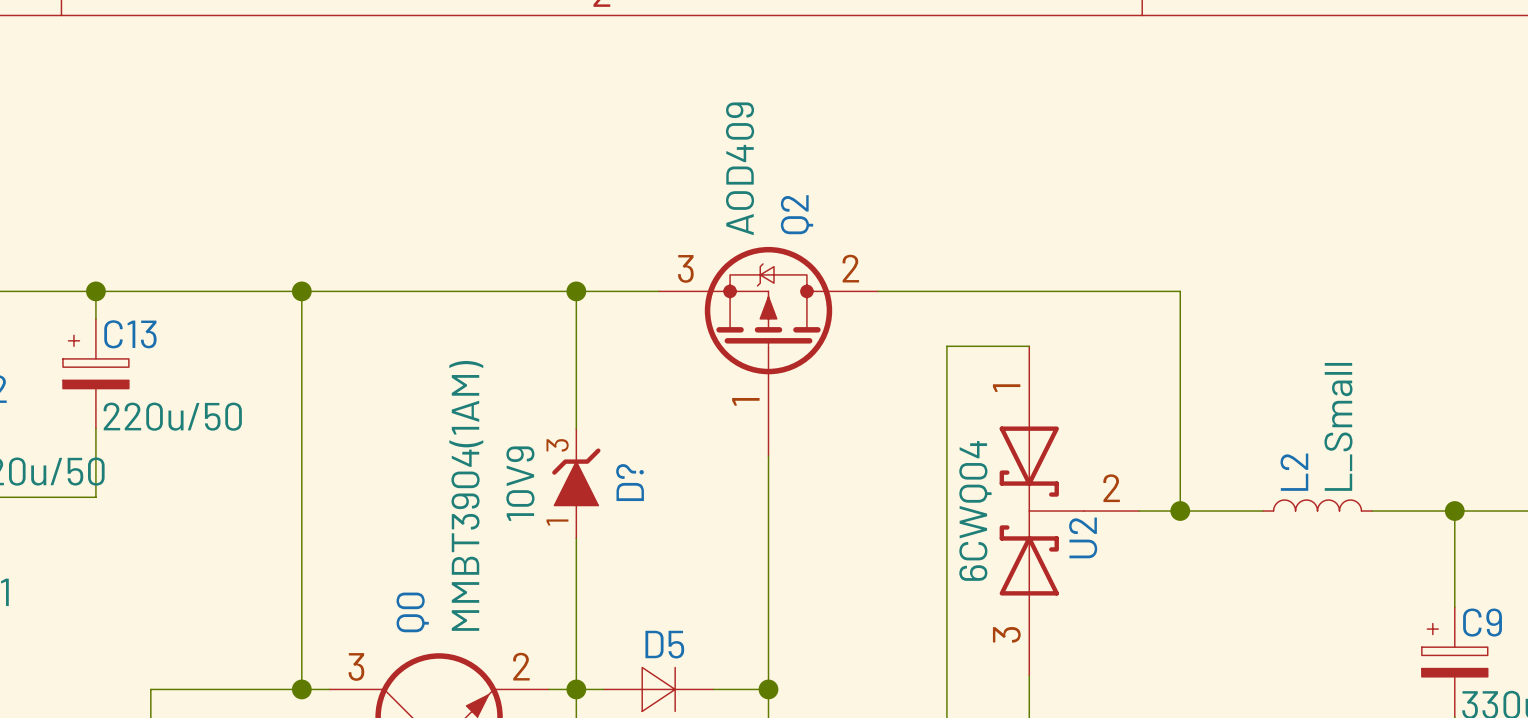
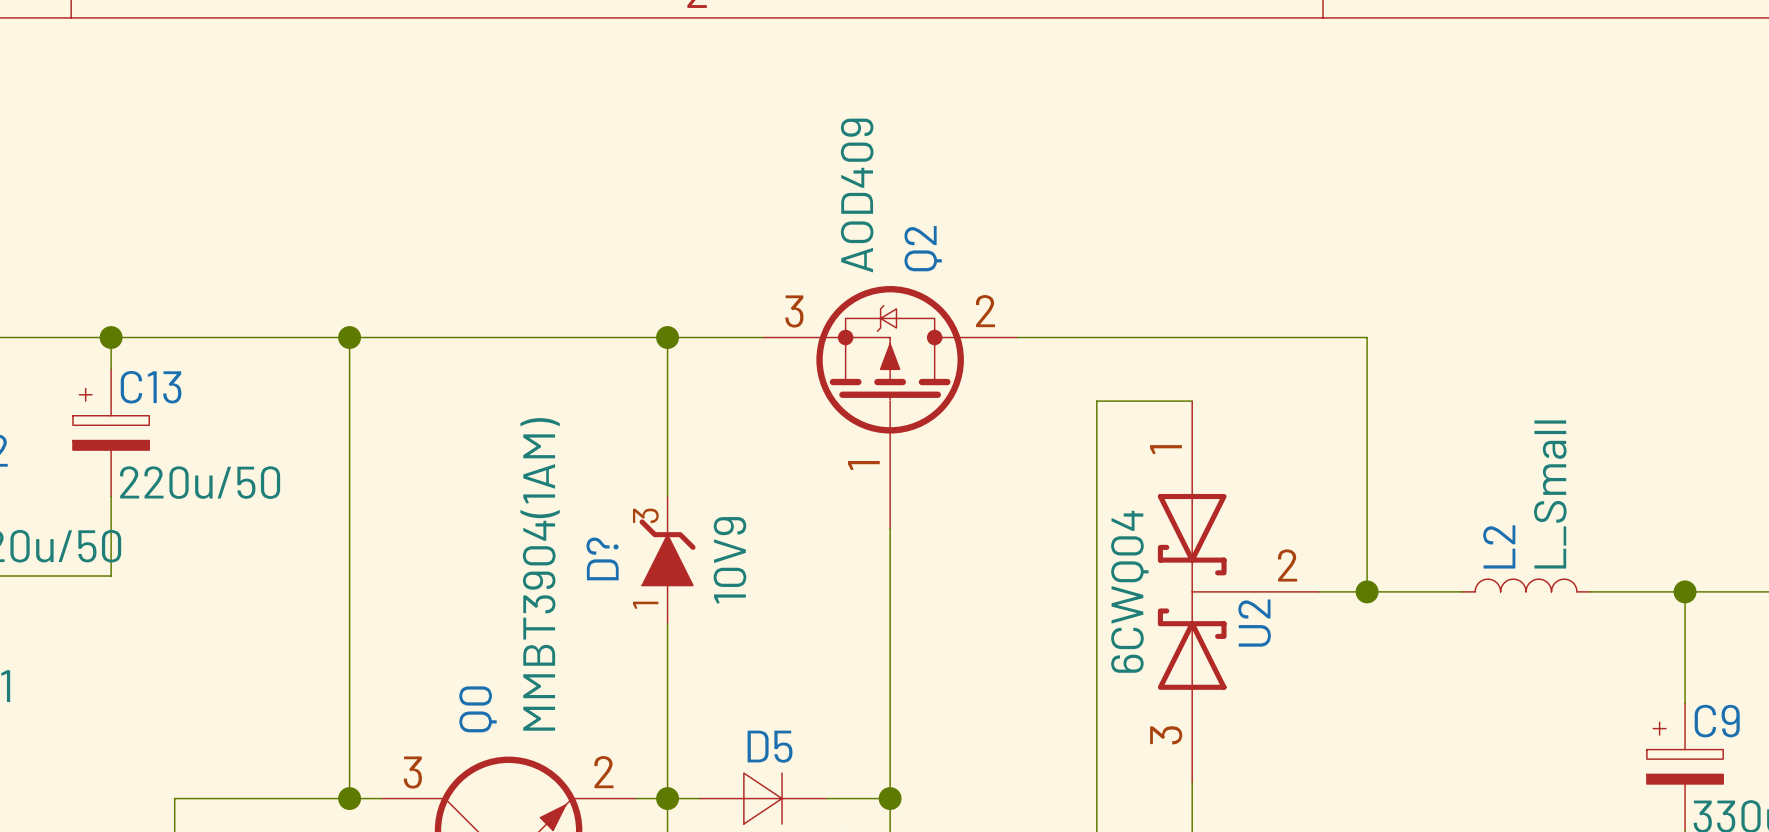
D? flip: as is (576, 476) -> left-right (667, 552)

